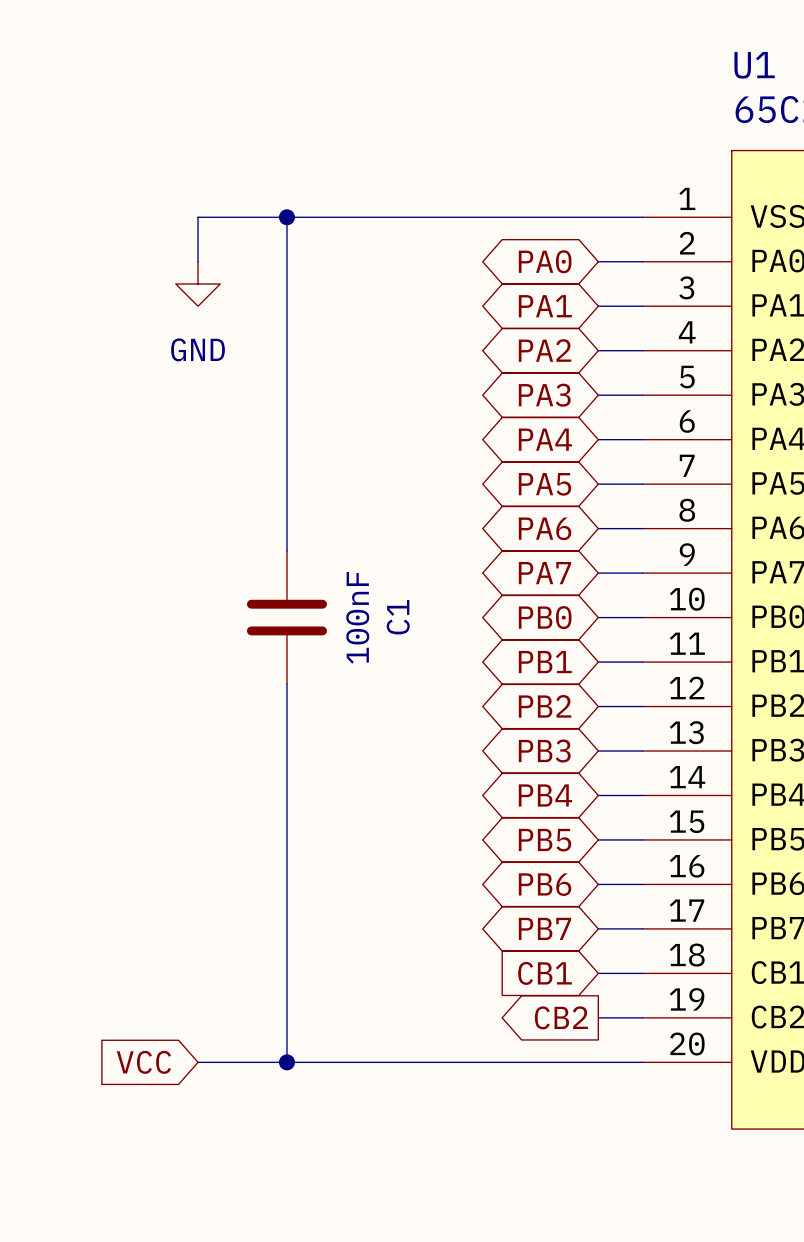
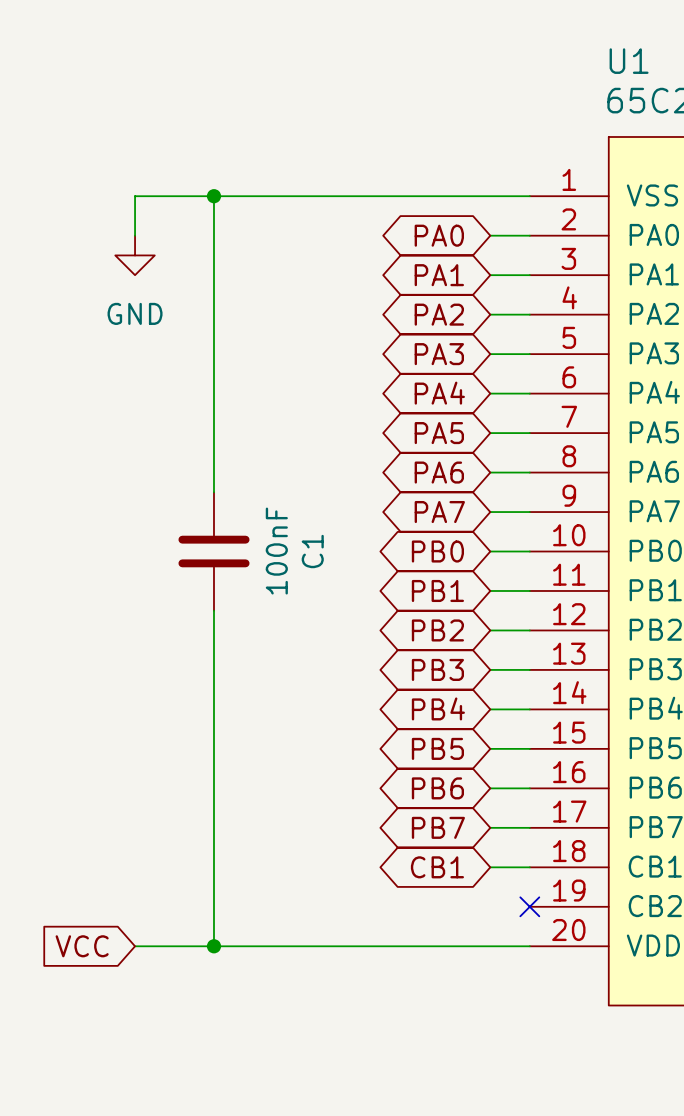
global label shape: input (544, 973) -> bidirectional (437, 867)
global label: CB2 (561, 1017) -> none
wire: (598, 1017) (642, 1017) -> none
no-connect mark: none -> (529, 906)

